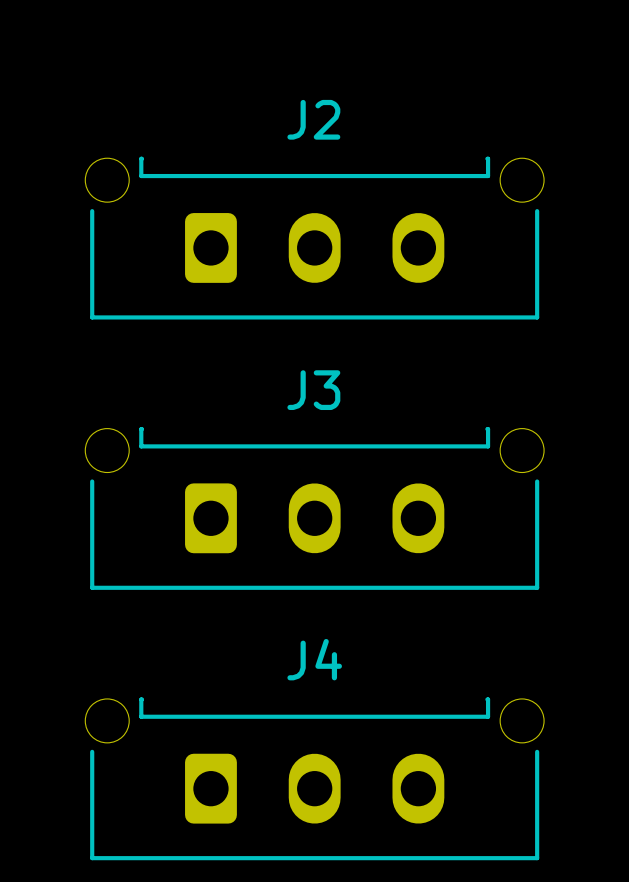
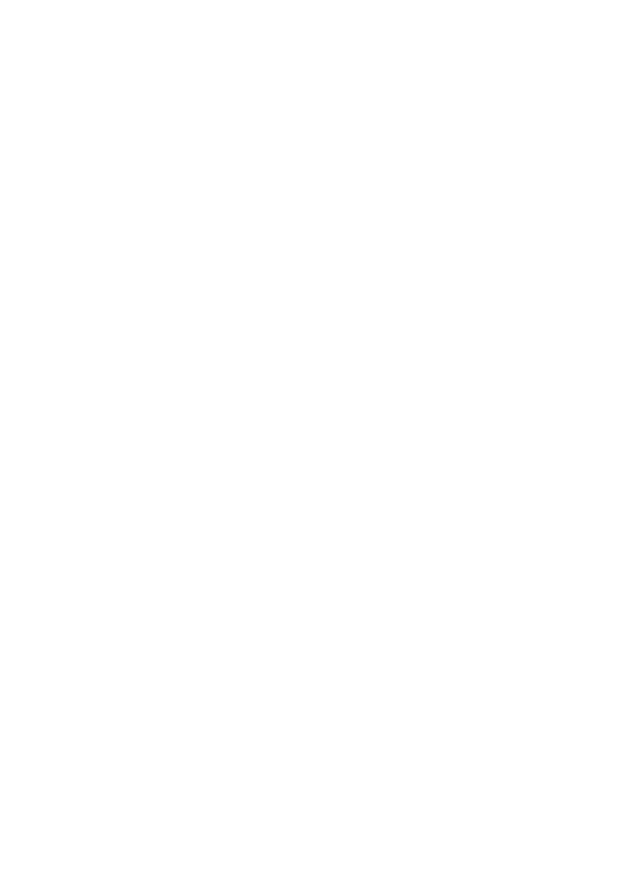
J2: (314, 238) -> none
J3: (314, 508) -> none
J4: (314, 778) -> none

